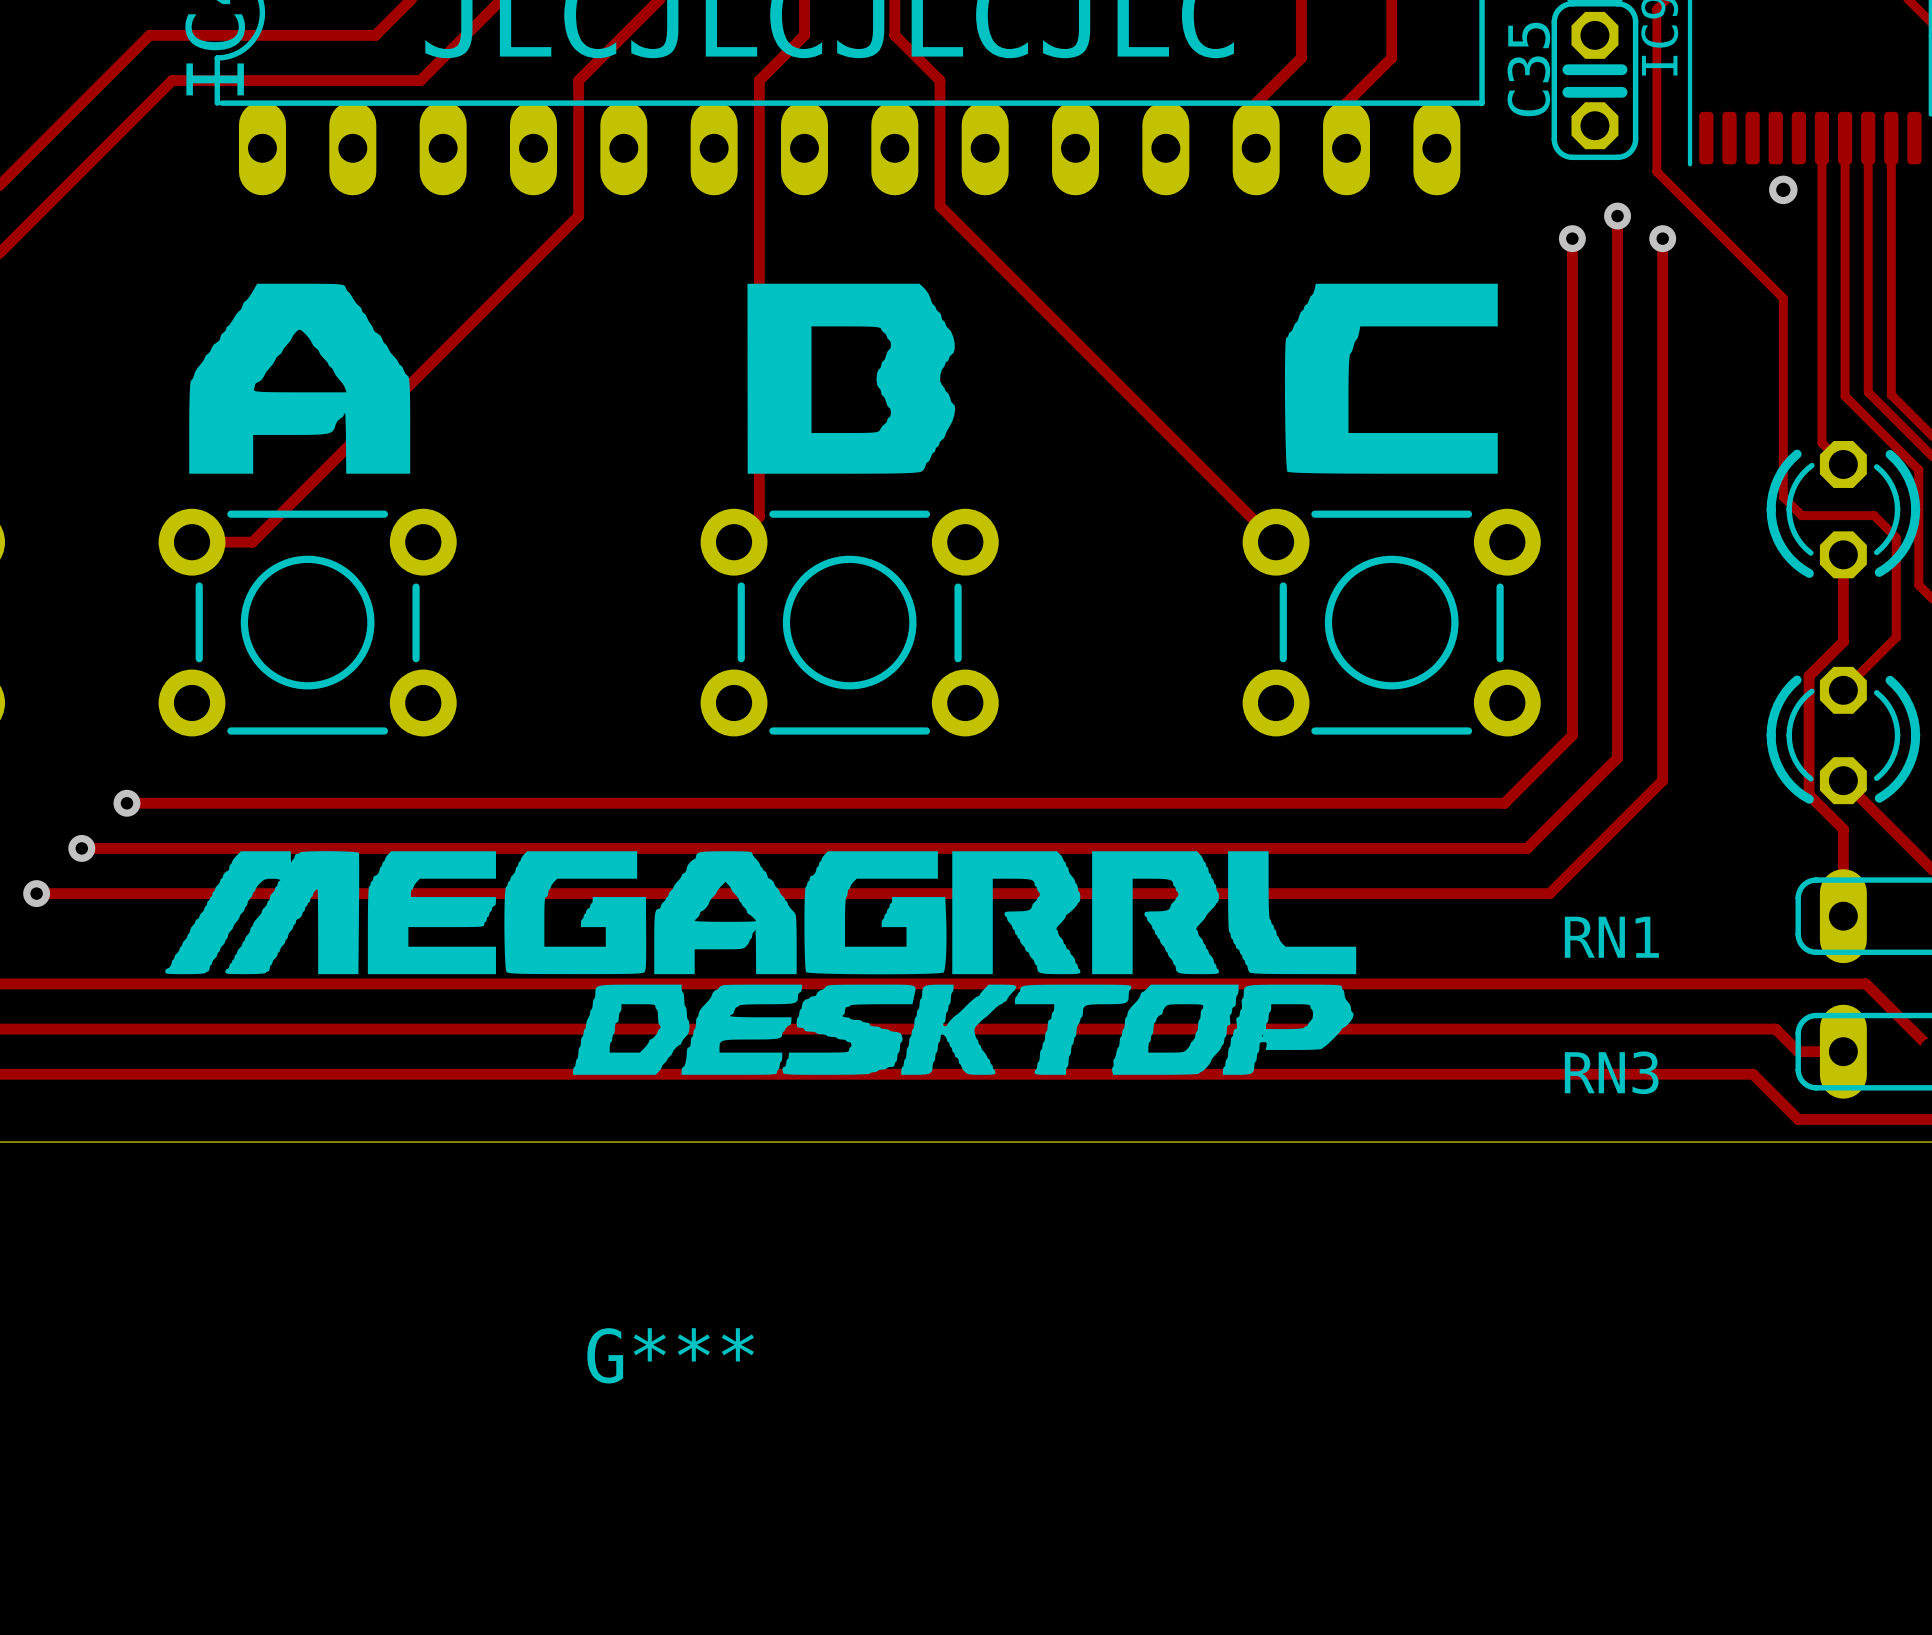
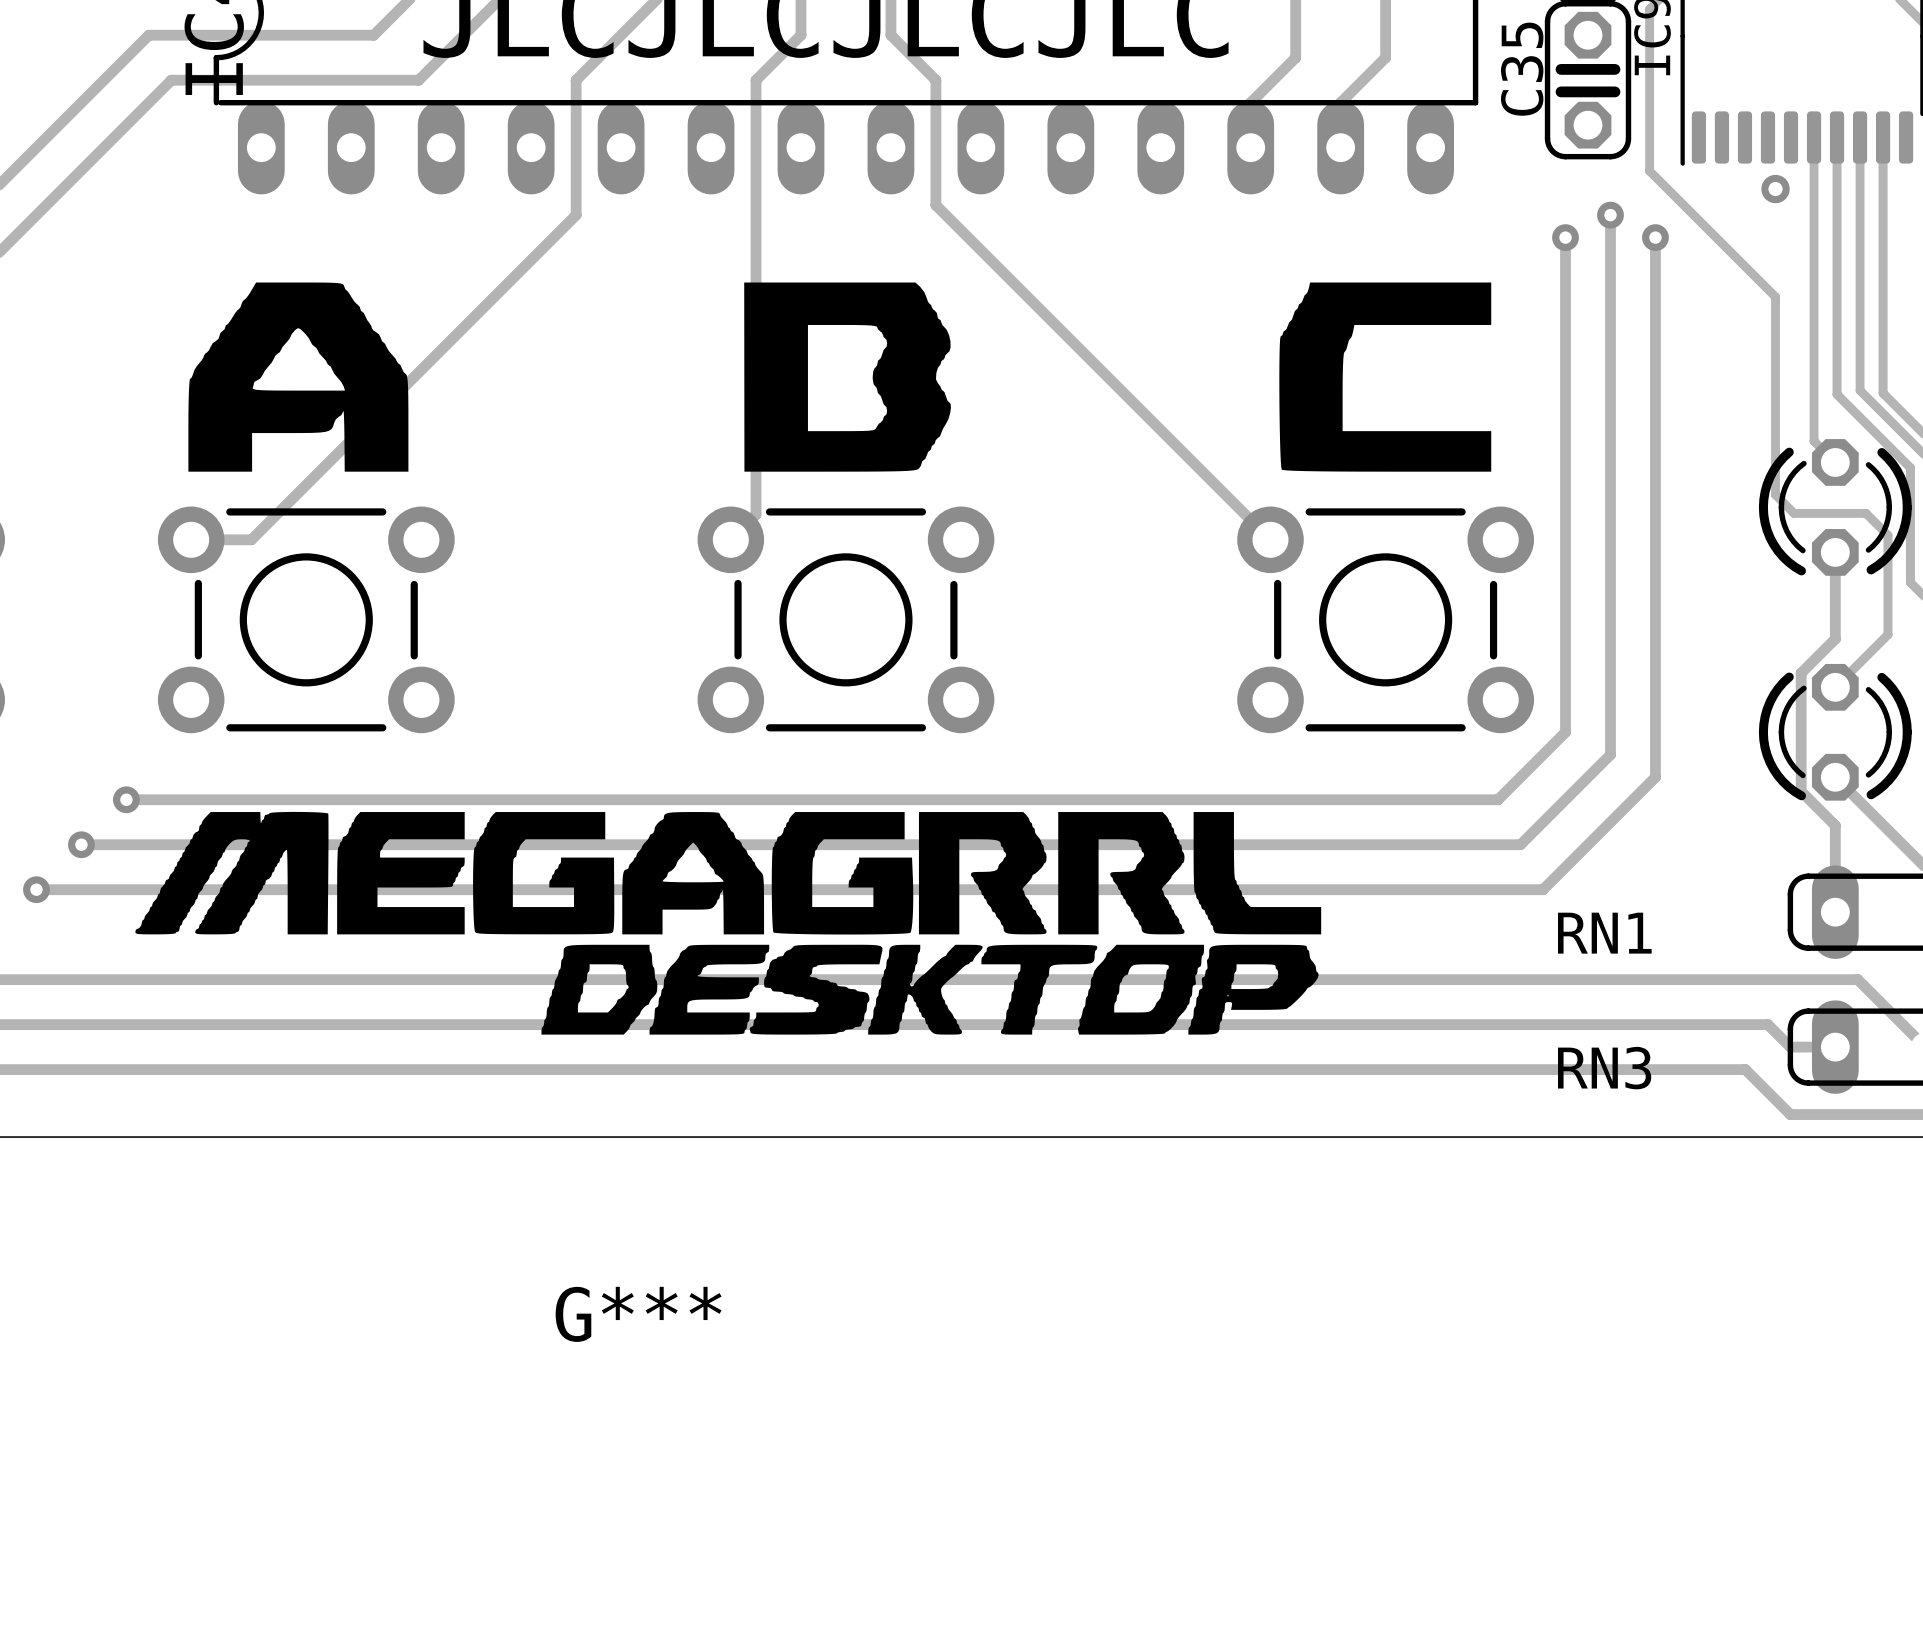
G*** position: (760, 963) -> (728, 923)

